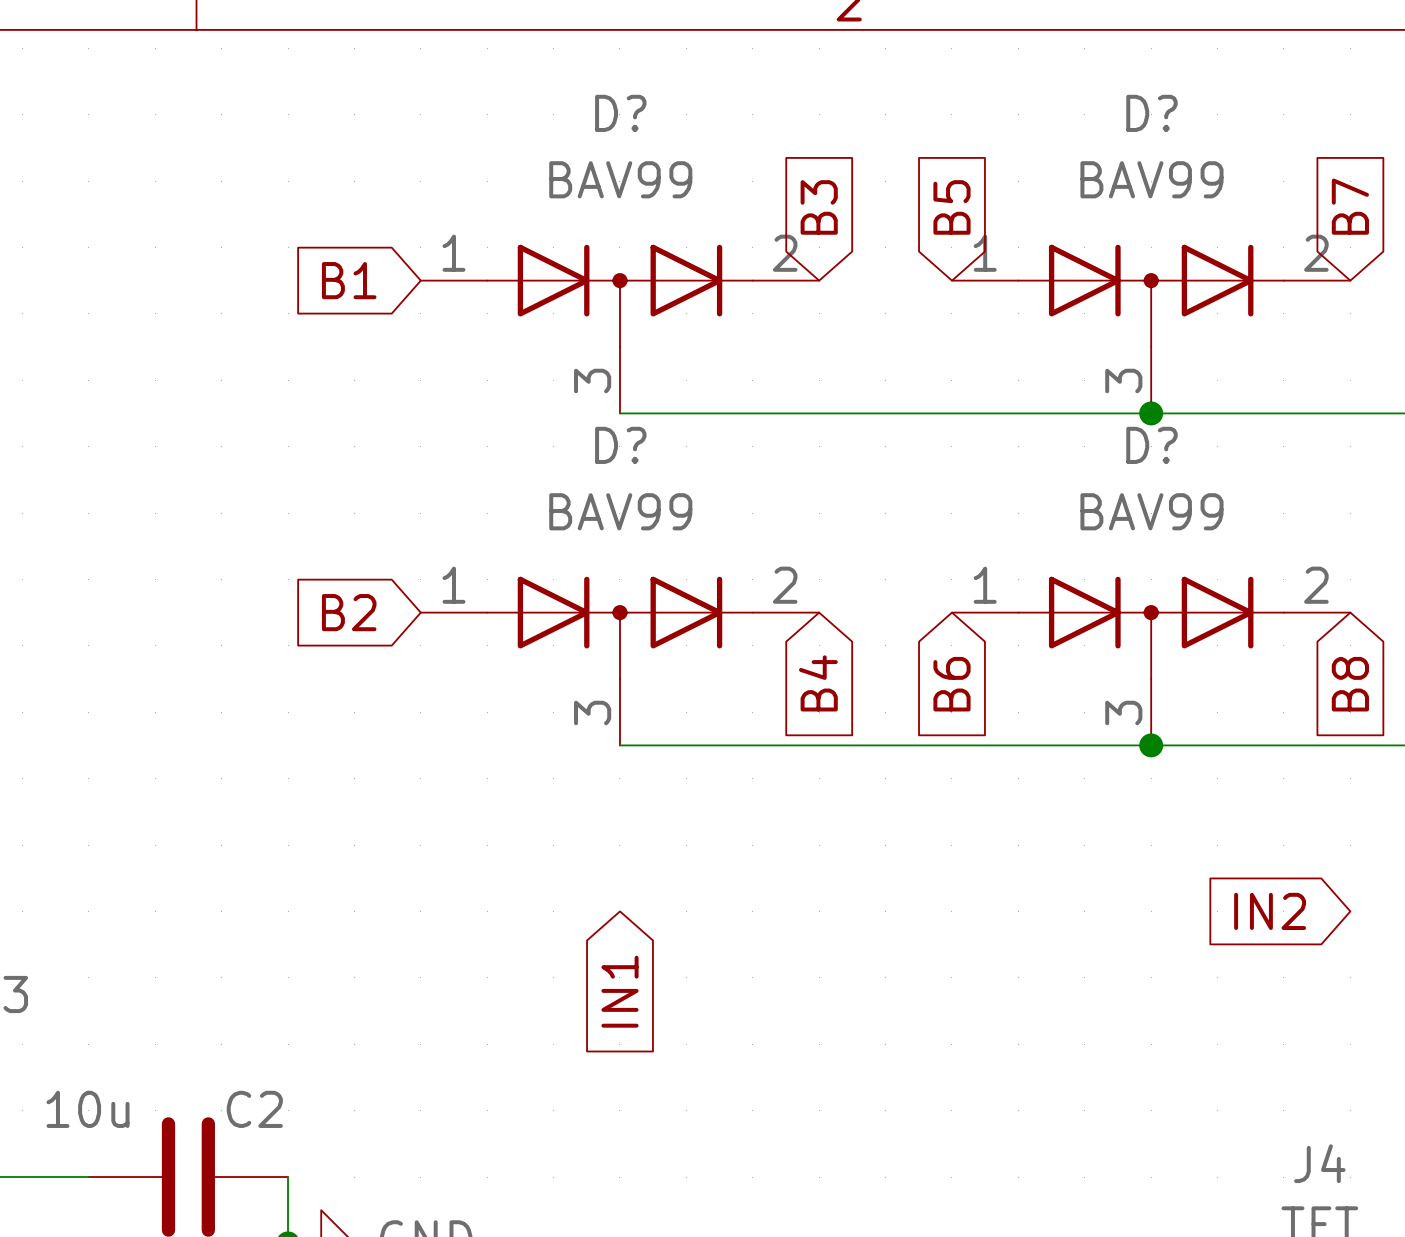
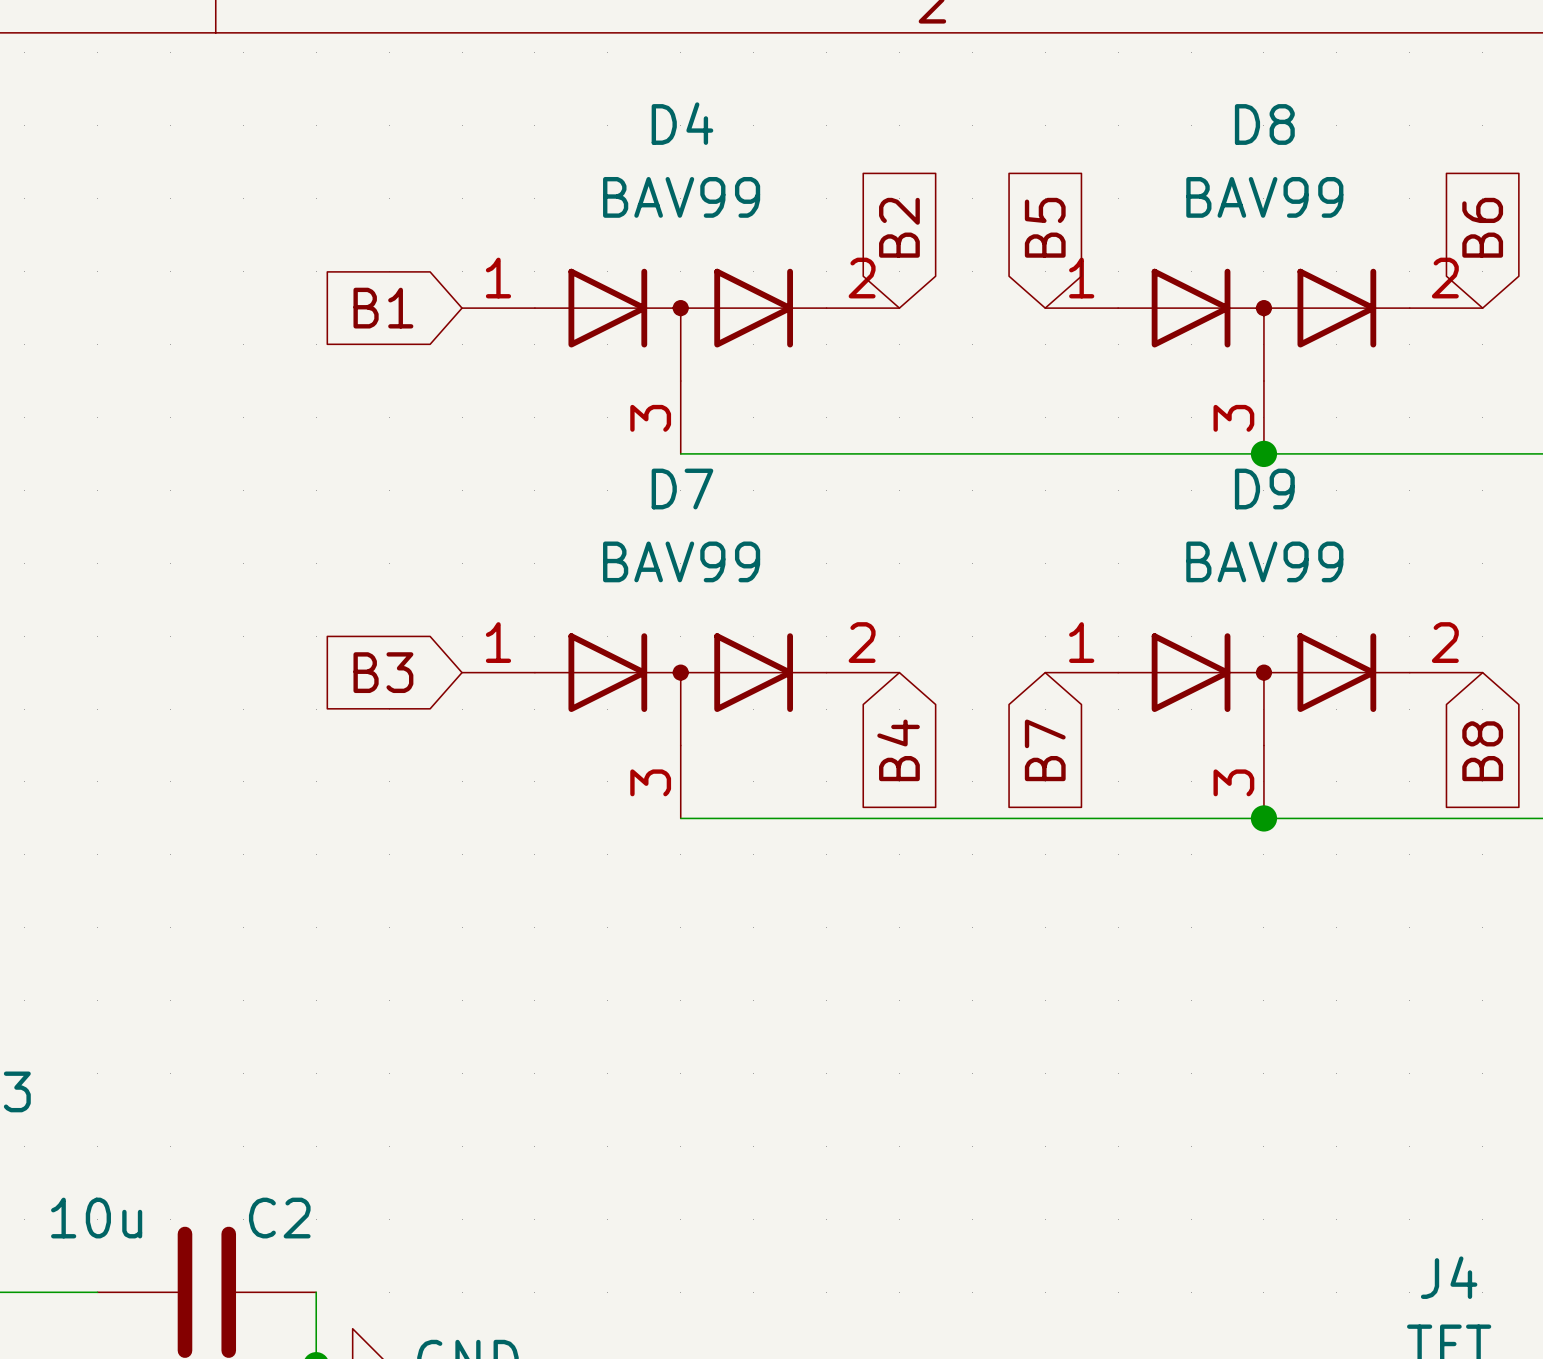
D? name: D? (620, 113) -> D4 (682, 123)
D? name: D? (1151, 113) -> D8 (1264, 124)
global label: B7 (1350, 206) -> B6 (1482, 227)
global label: B3 (819, 207) -> B2 (899, 227)
D? name: D? (620, 445) -> D7 (682, 489)
D? name: D? (1151, 445) -> D9 (1264, 489)
global label: B2 (349, 612) -> B3 (383, 672)
global label: B6 (951, 684) -> B7 (1045, 750)
global label: IN2 (1270, 911) -> none
global label: IN1 (619, 991) -> none

